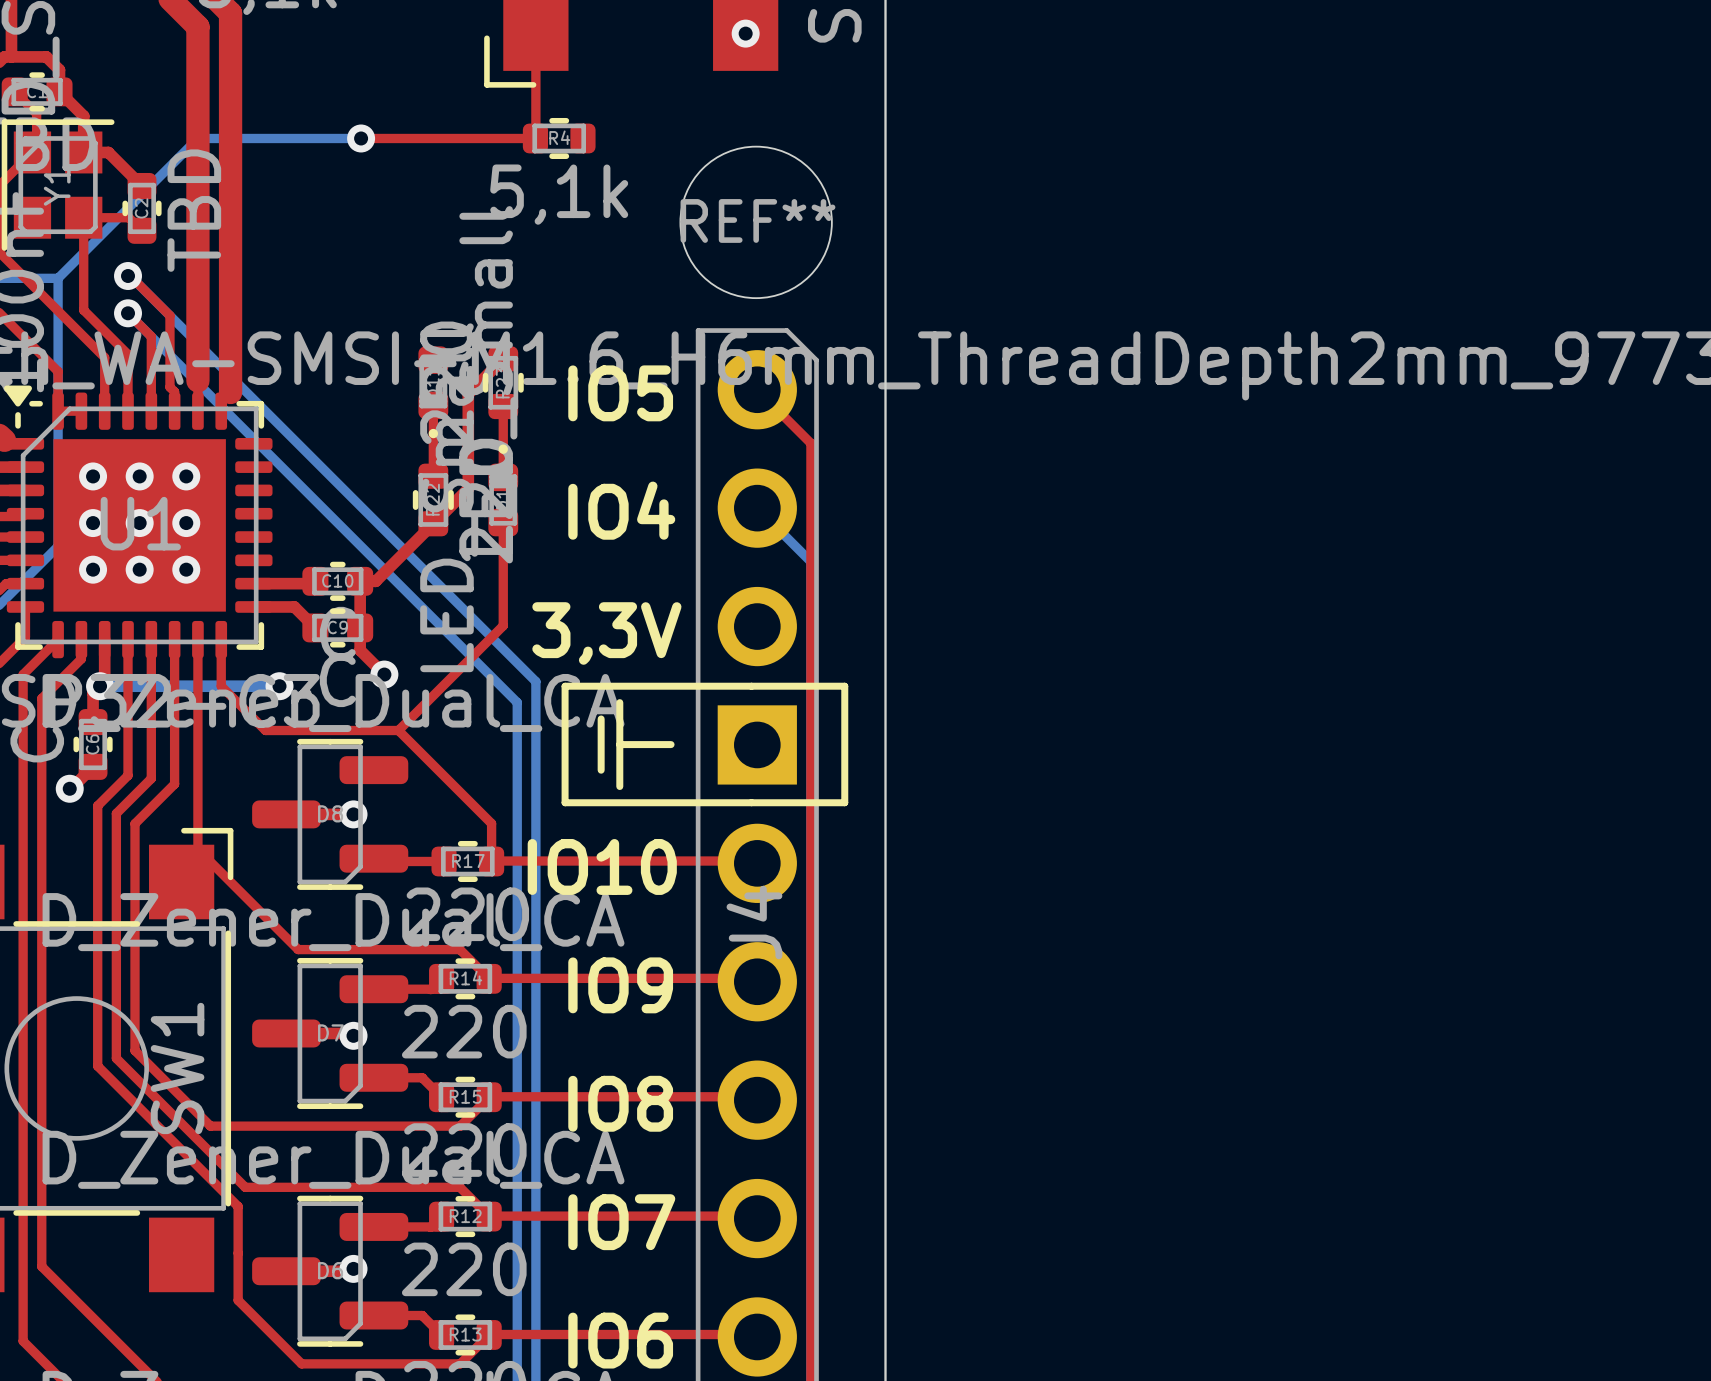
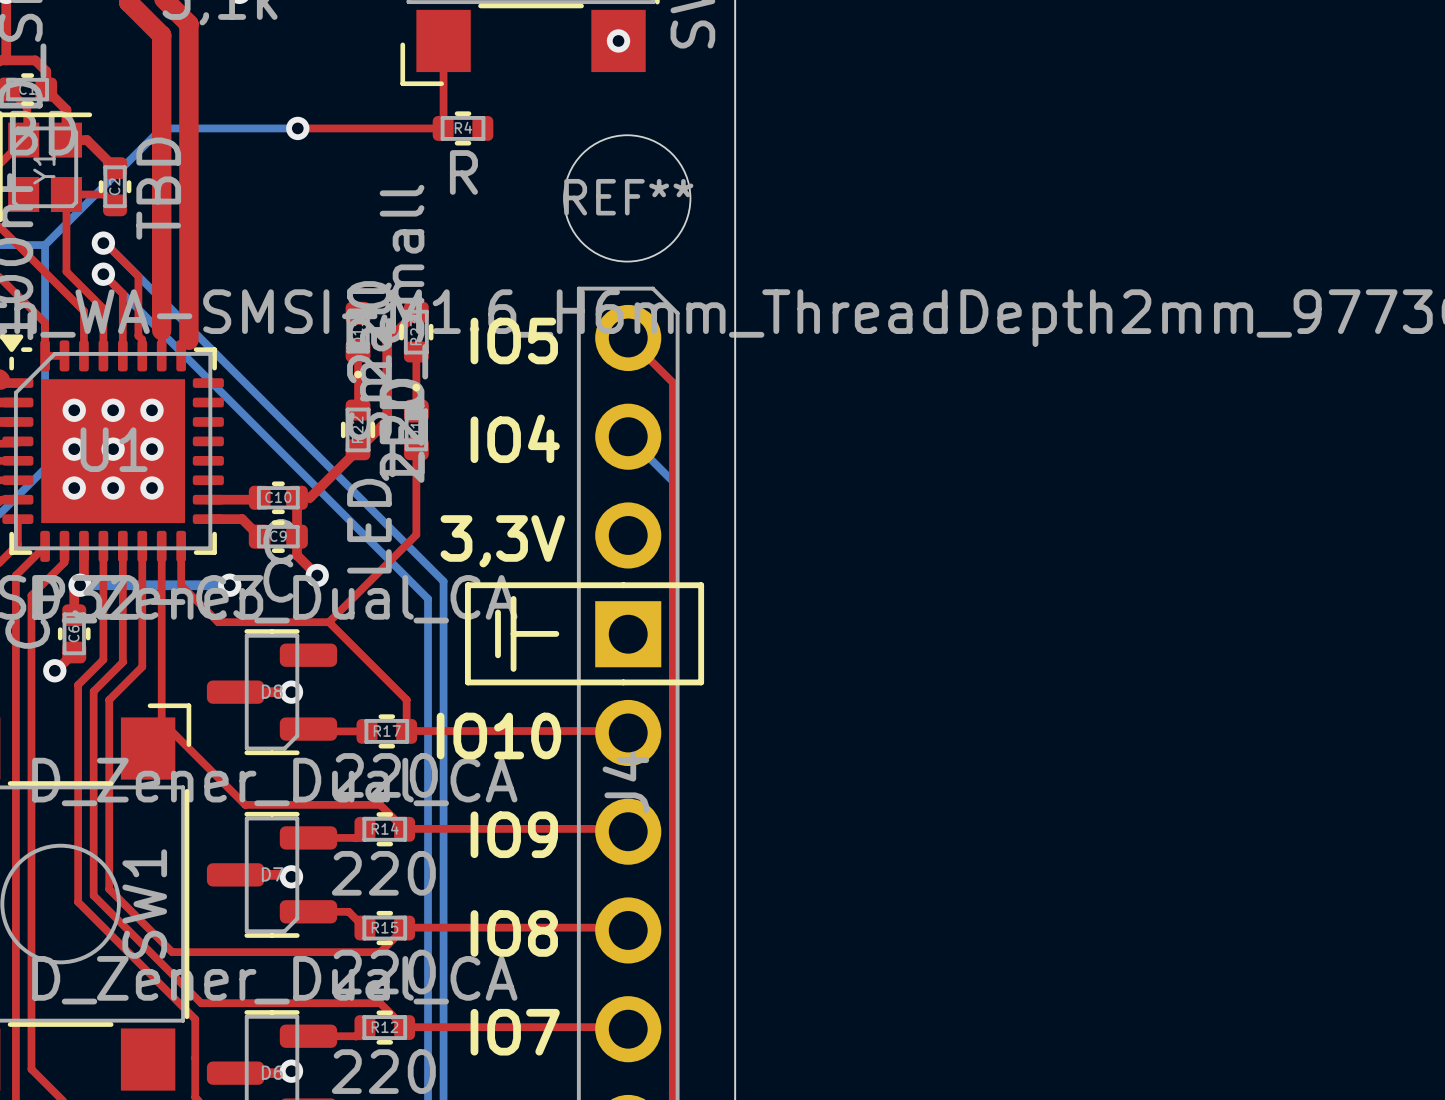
R4 value: 5,1k (559, 194) -> R (463, 172)

